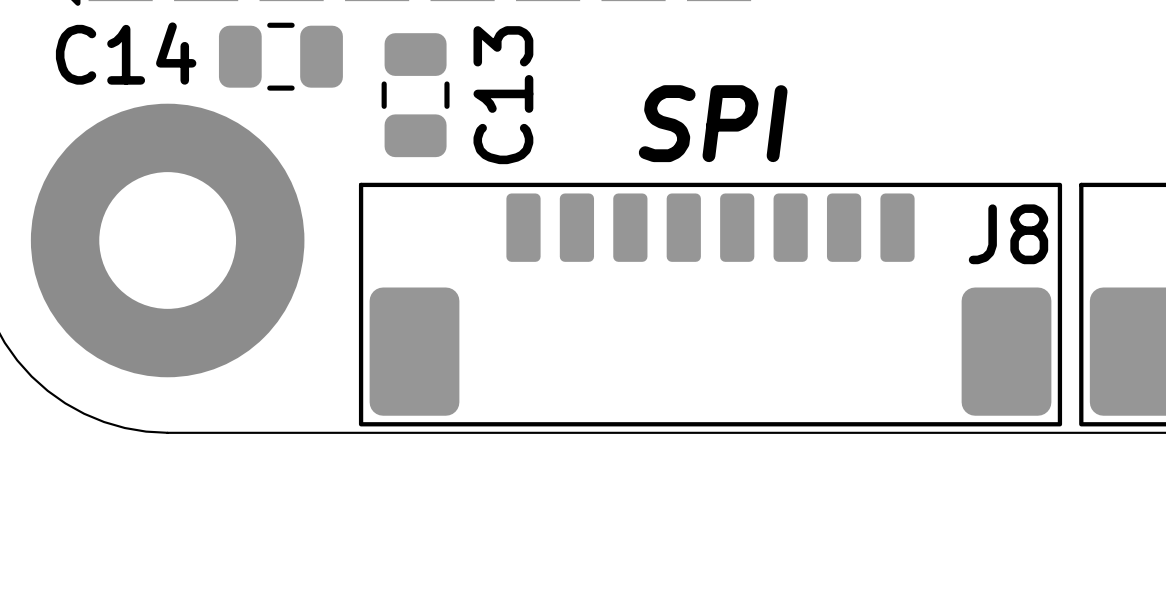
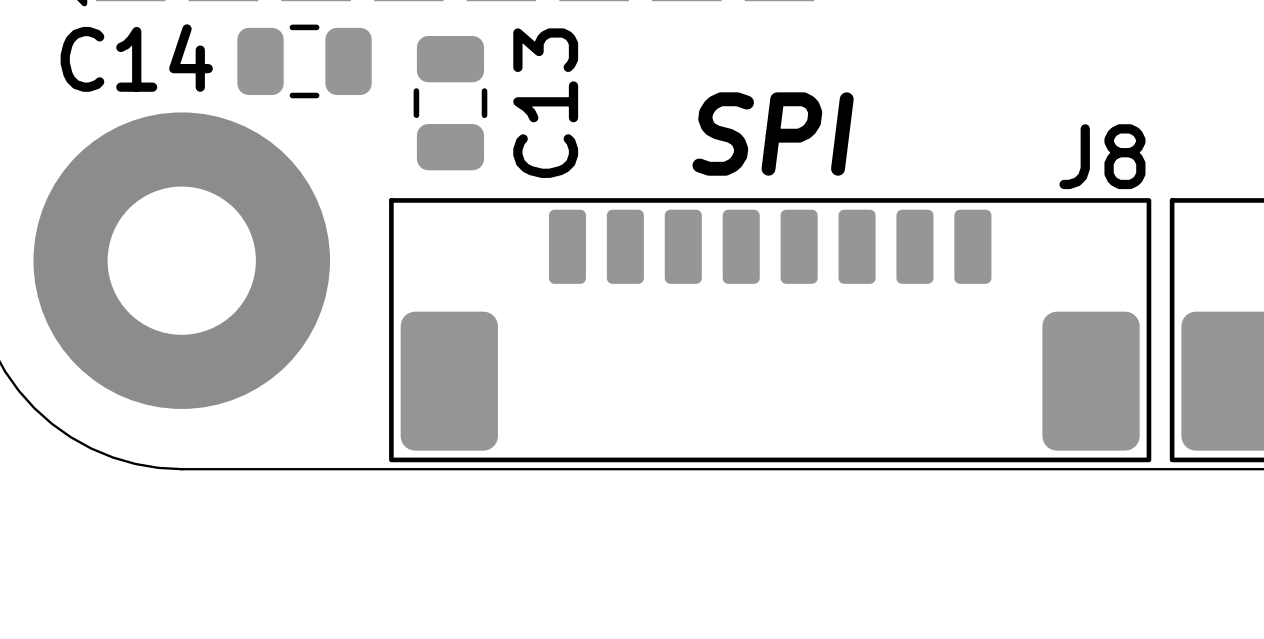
J8 name position: J8 (1008, 234) -> J8 (1102, 156)

